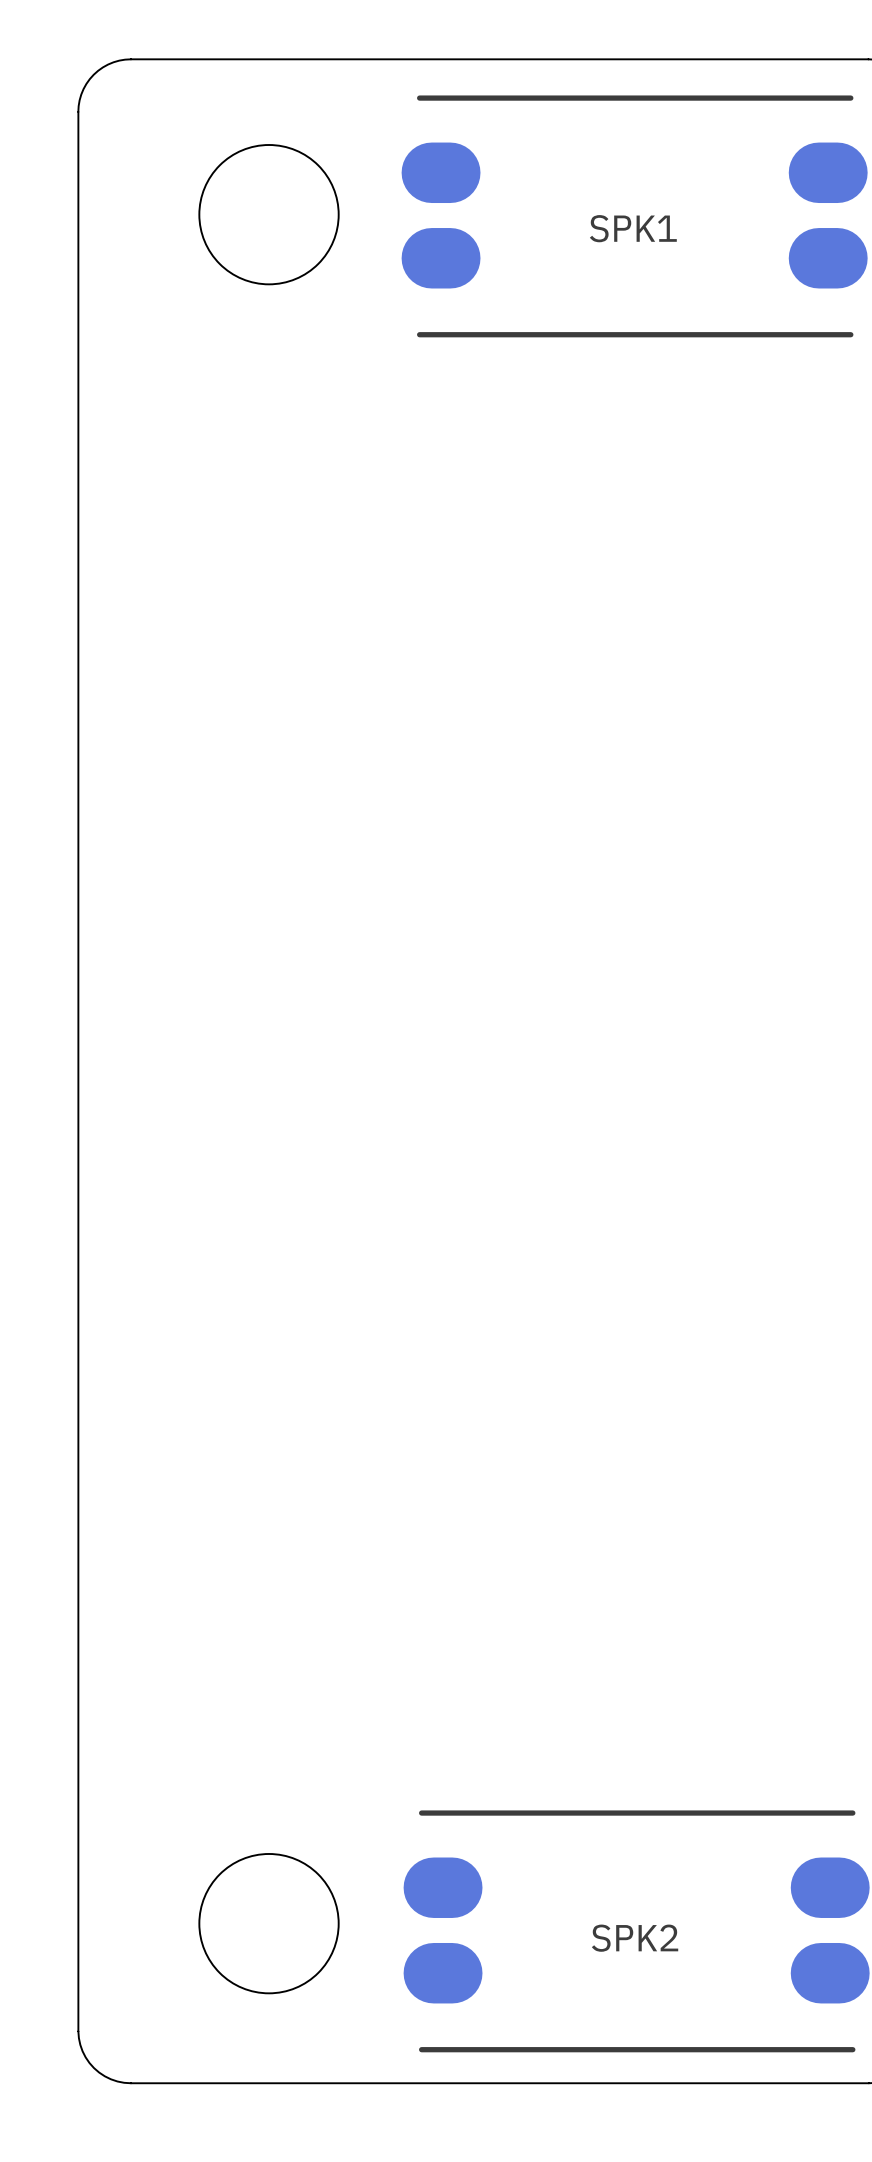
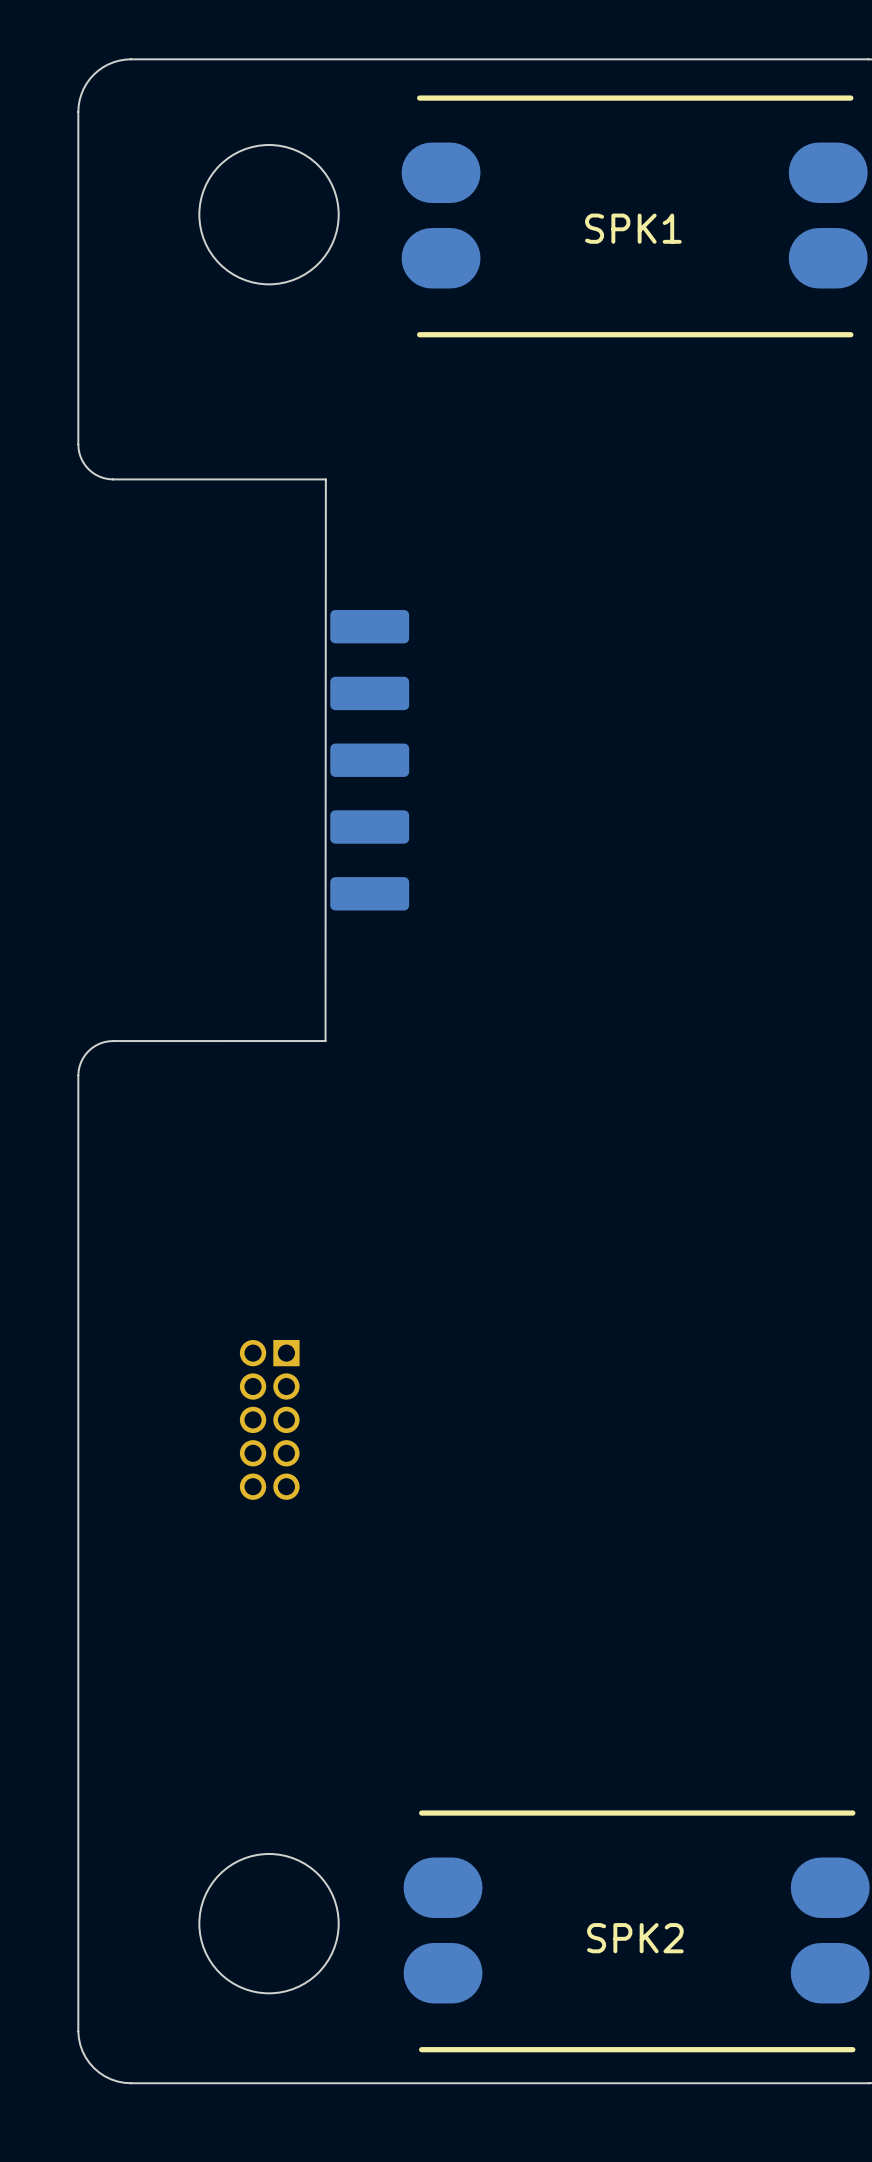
board edge: (78, 111) (78, 2031) (82, 2051) (94, 2068) (111, 2079) (130, 2083) -> (78, 111) (78, 444) (80, 457) (85, 465) (95, 474) (112, 479) (325, 479) (325, 1041) (108, 1041) (95, 1045) (88, 1051) (81, 1062) (78, 1070) (78, 2031) (82, 2051) (94, 2068) (111, 2079) (130, 2083)
part: none -> (369, 760)
part: none -> (269, 1419)

